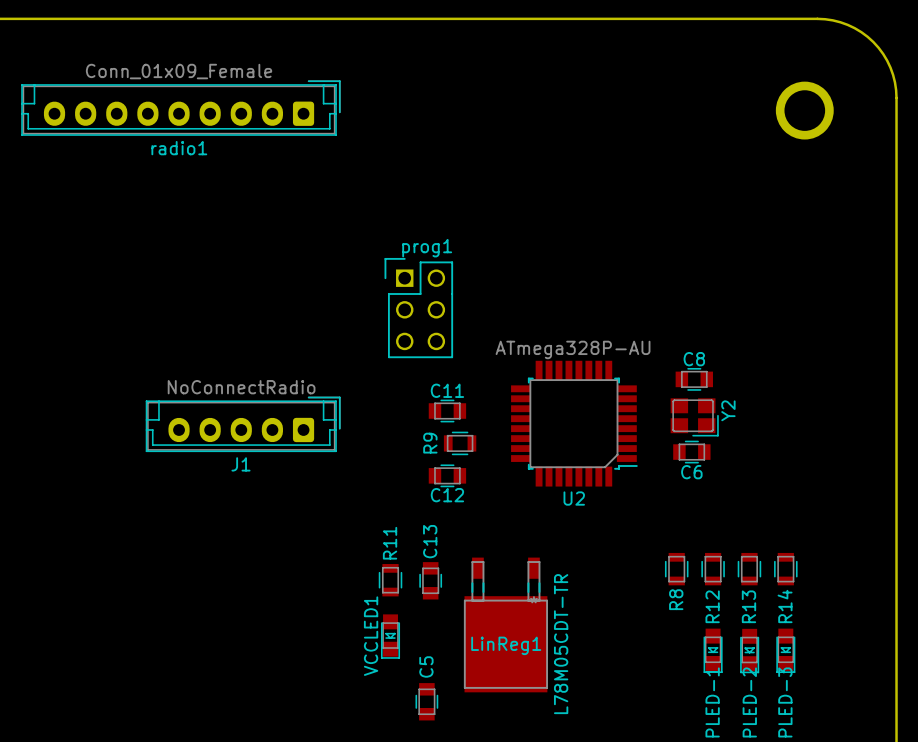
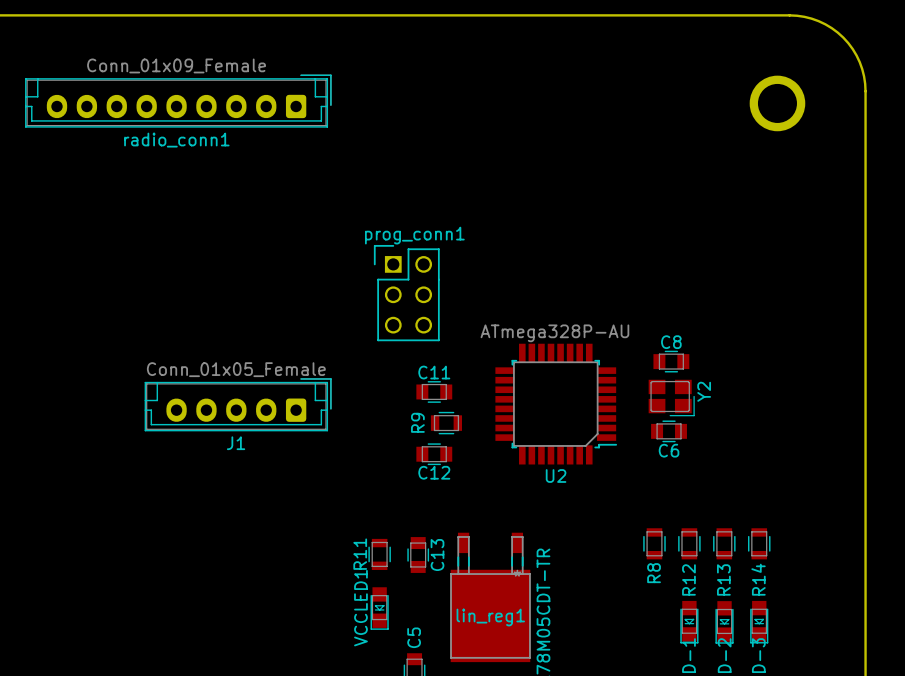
radio1 name: radio1 (179, 148) -> radio_conn1 (176, 140)
prog1 name: prog1 (427, 248) -> prog_conn1 (414, 235)
J1 value: NoConnectRadio (241, 387) -> Conn_01x05_Female (236, 369)
C13 name position: C13 (430, 541) -> C13 (437, 555)
R11 name position: R11 (390, 543) -> R11 (360, 554)
LinReg1 name: LinReg1 (506, 645) -> lin_reg1 (490, 617)

